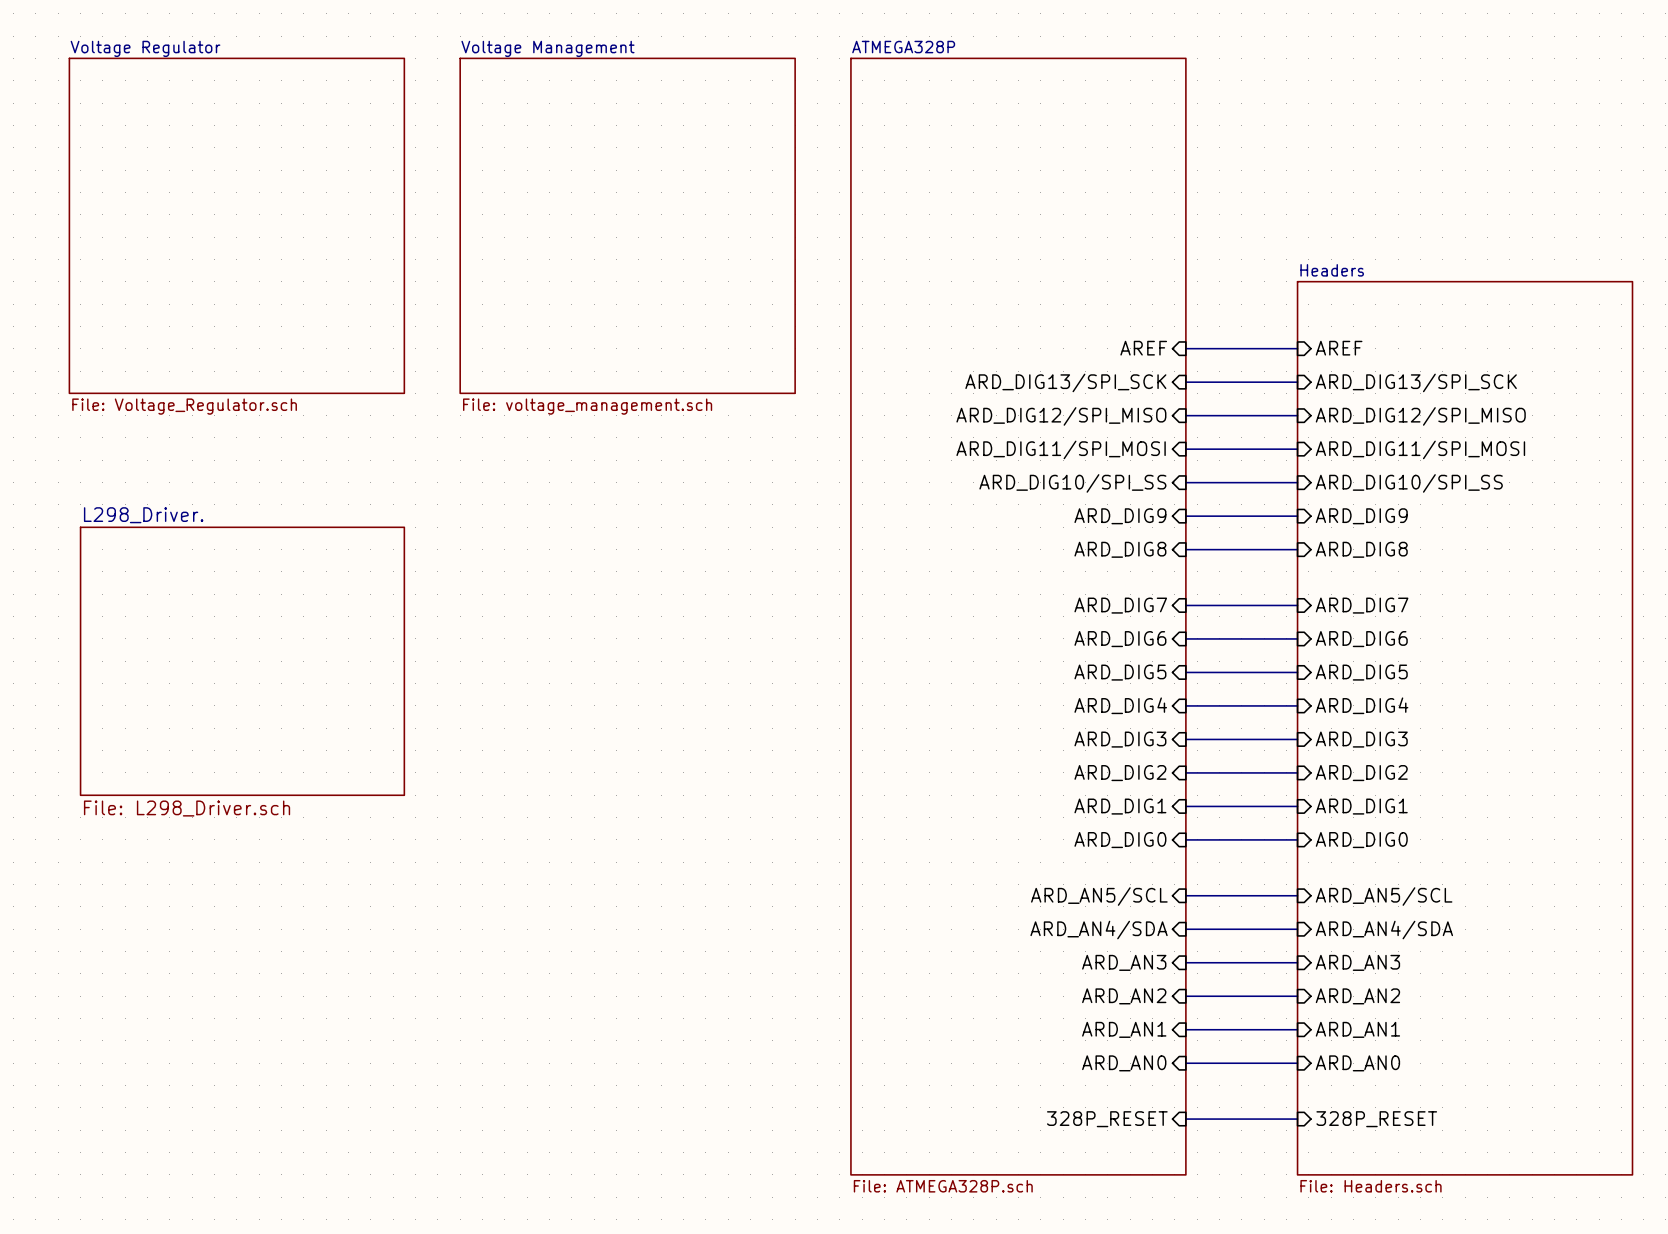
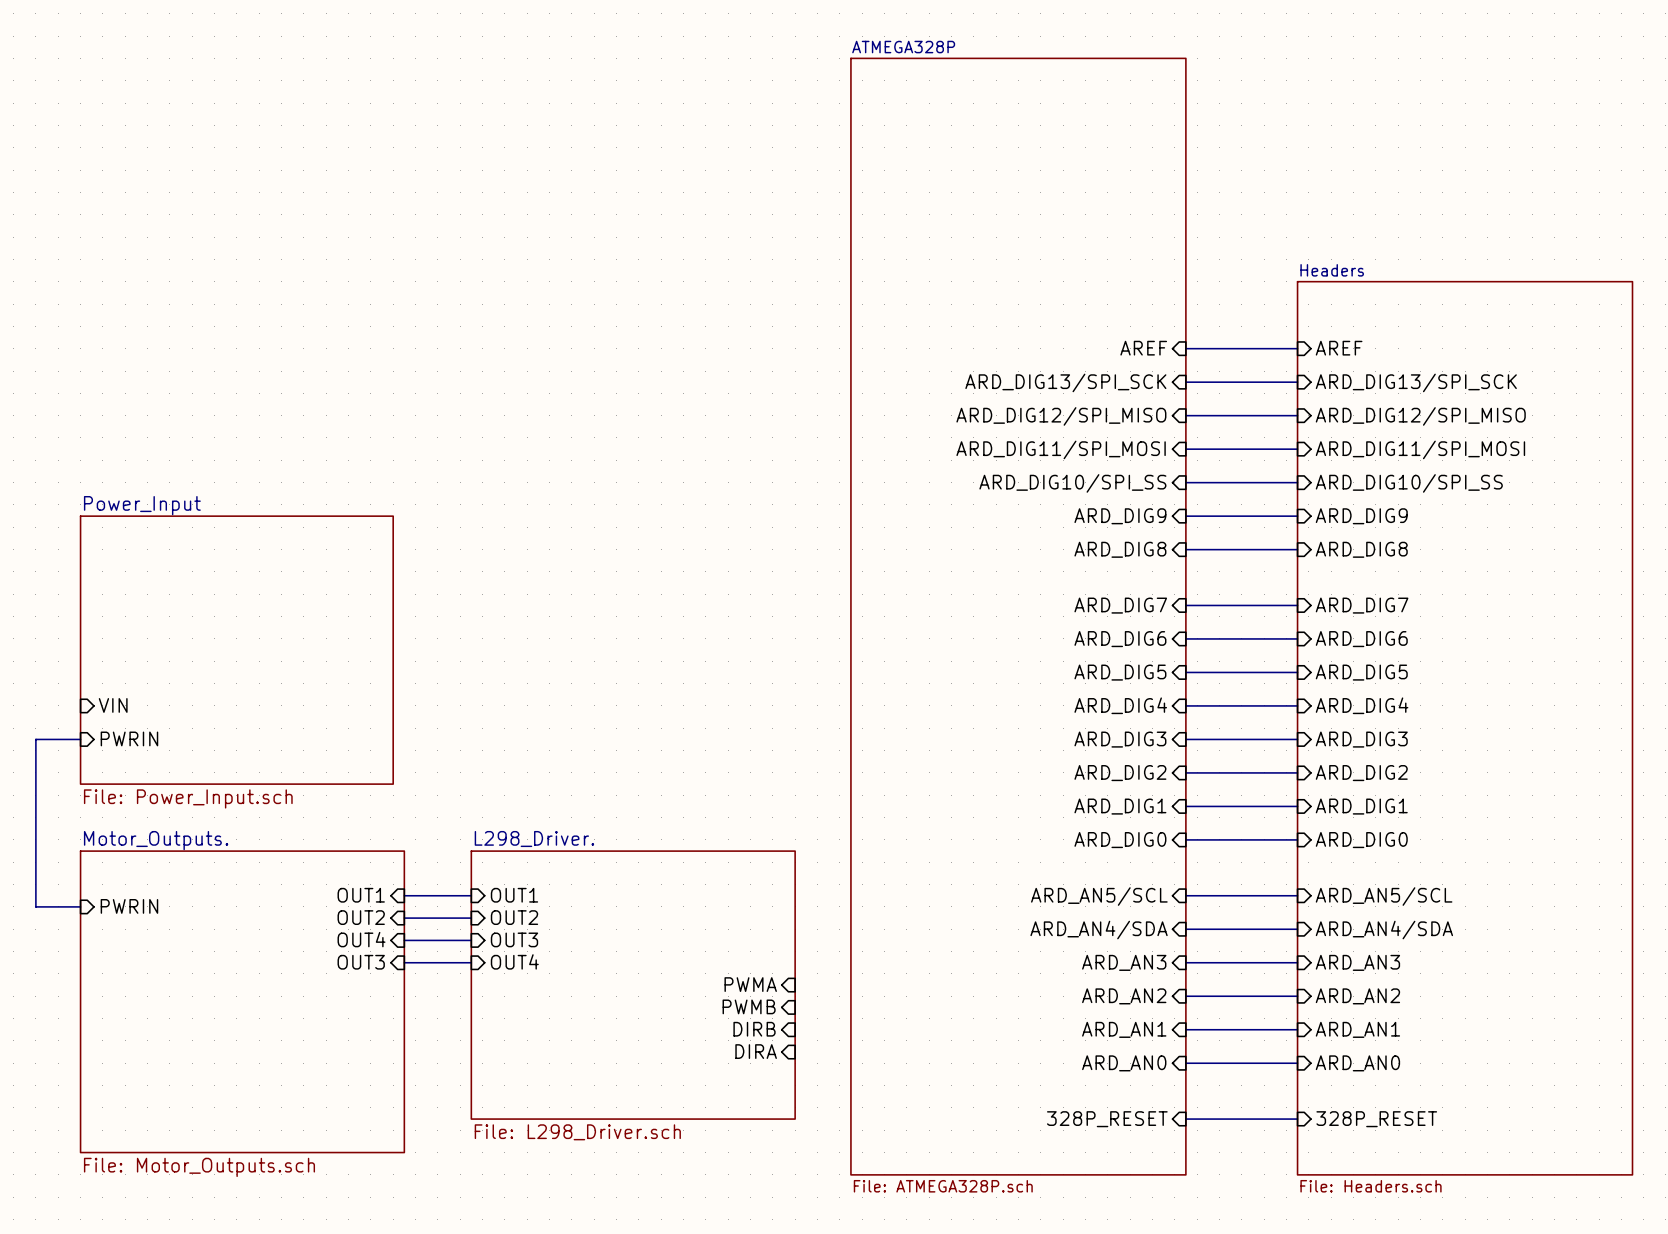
sheet Voltage Regulator: File: Voltage_Regulator.sch (236, 225) -> none
sheet Voltage Management: File: voltage_management.sch (627, 225) -> none
sheet Power_Input: none -> File: Power_Input.sch (236, 650)
sheet L298_Driver. position: (242, 661) -> (633, 985)
sheet pin: none -> VIN (113, 705)
sheet pin: none -> PWRIN (129, 738)
wire: none -> (80, 739) (35, 739) (35, 906) (80, 906)
sheet pin: none -> OUT1 (361, 895)
wire: none -> (404, 895) (471, 895)
sheet pin: none -> OUT1 (514, 895)
sheet pin: none -> PWRIN (129, 906)
sheet pin: none -> OUT2 (361, 917)
sheet pin: none -> OUT2 (514, 917)
wire: none -> (404, 918) (471, 918)
sheet pin: none -> OUT4 (361, 939)
sheet pin: none -> OUT3 (514, 939)
wire: none -> (404, 940) (471, 940)
sheet pin: none -> OUT4 (514, 961)
sheet pin: none -> OUT3 (361, 962)
wire: none -> (404, 962) (471, 962)
sheet pin: none -> PWMA (750, 984)
sheet Motor_Outputs.: none -> File: Motor_Outputs.sch (242, 1001)
sheet pin: none -> PWMB (749, 1006)
sheet pin: none -> DIRB (754, 1029)
sheet pin: none -> DIRA (756, 1051)

